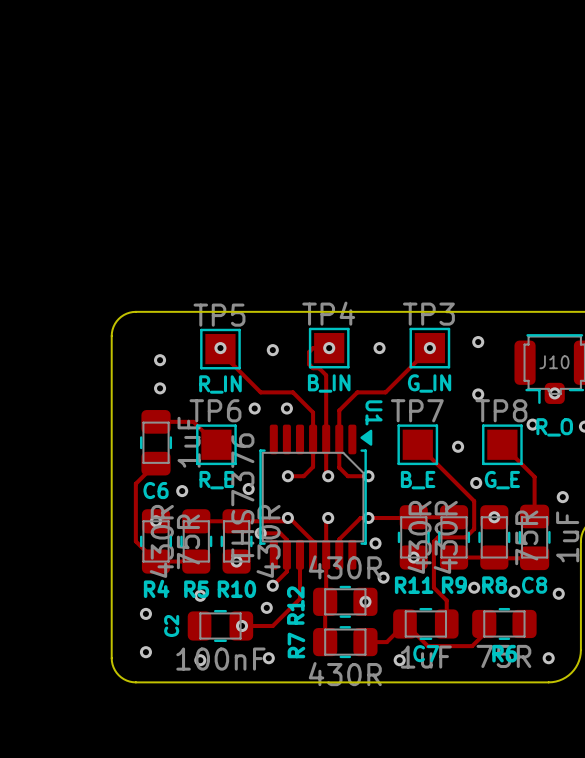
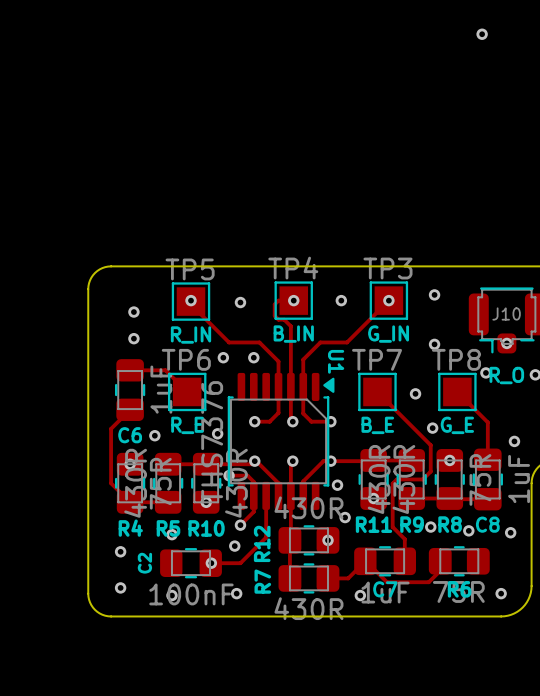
via: none -> (482, 34)

